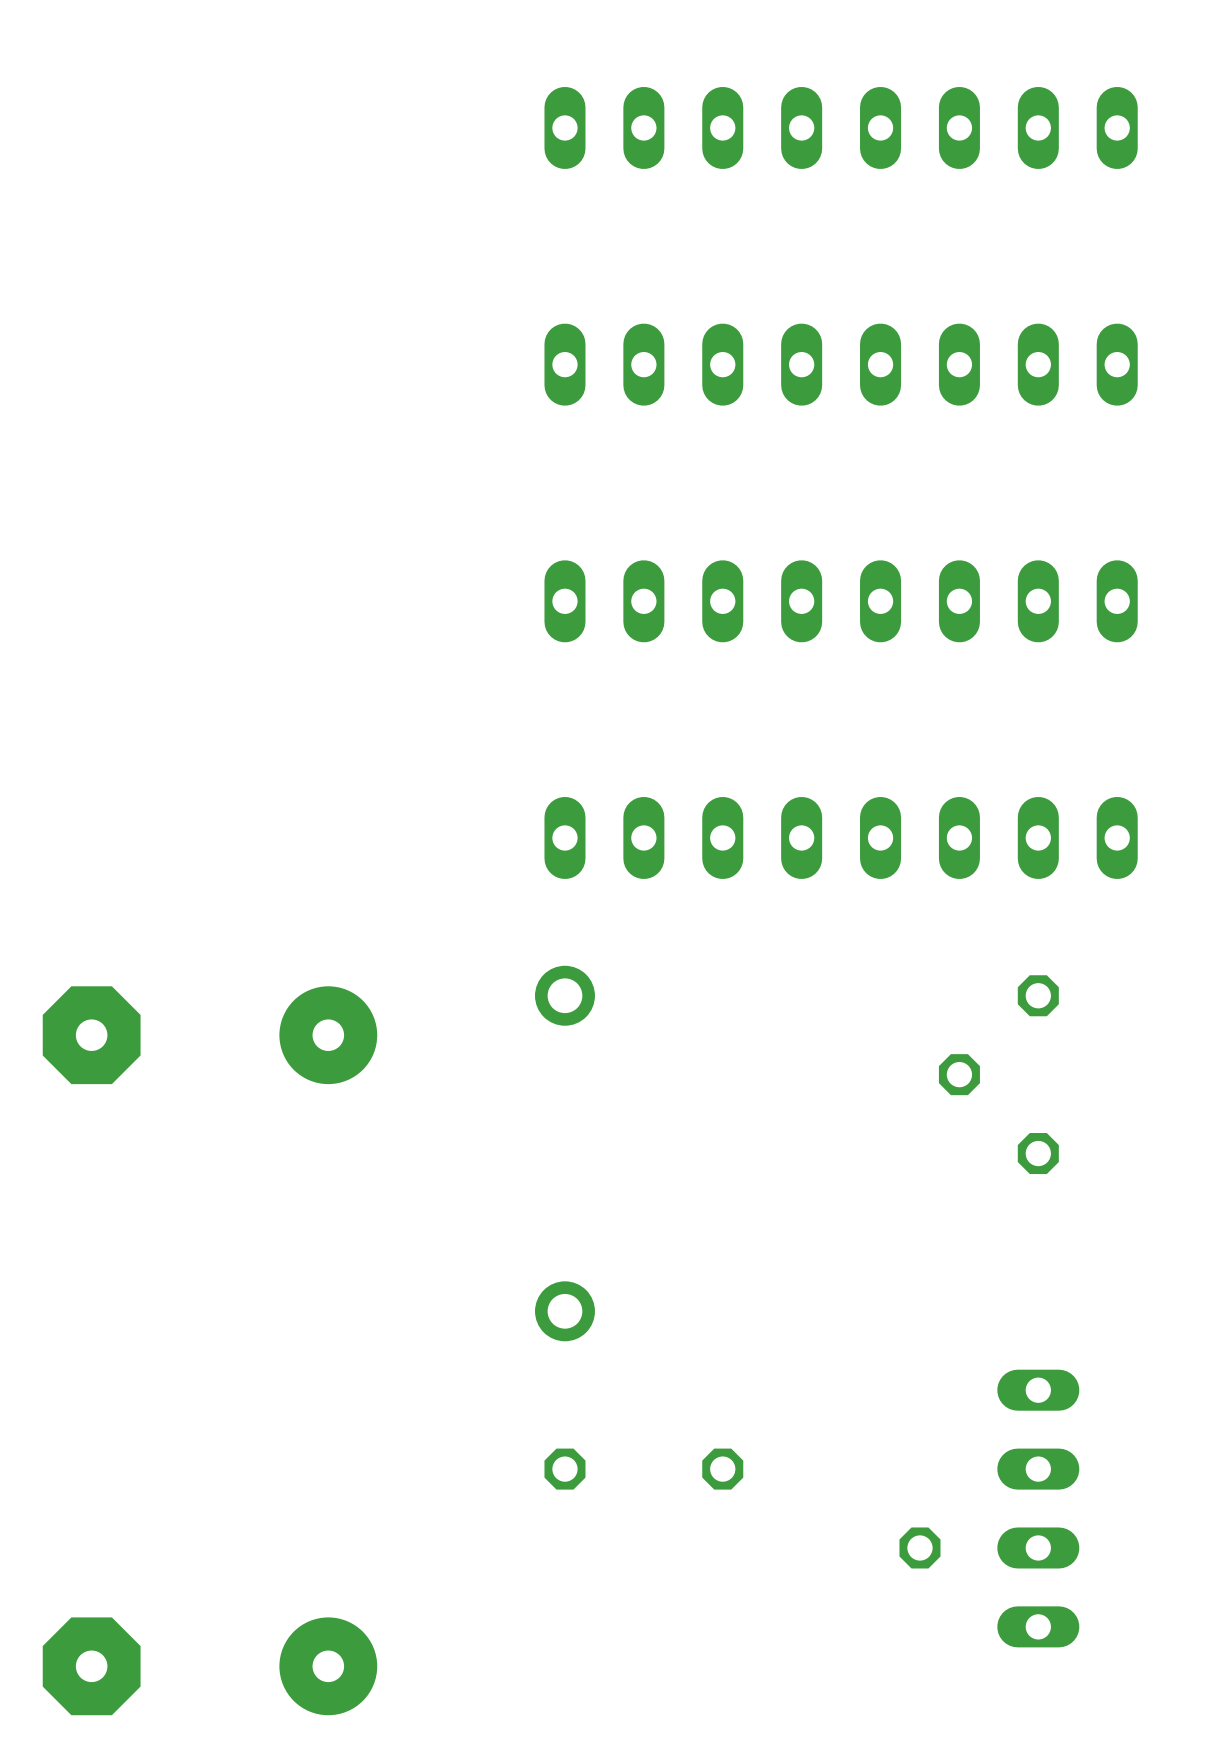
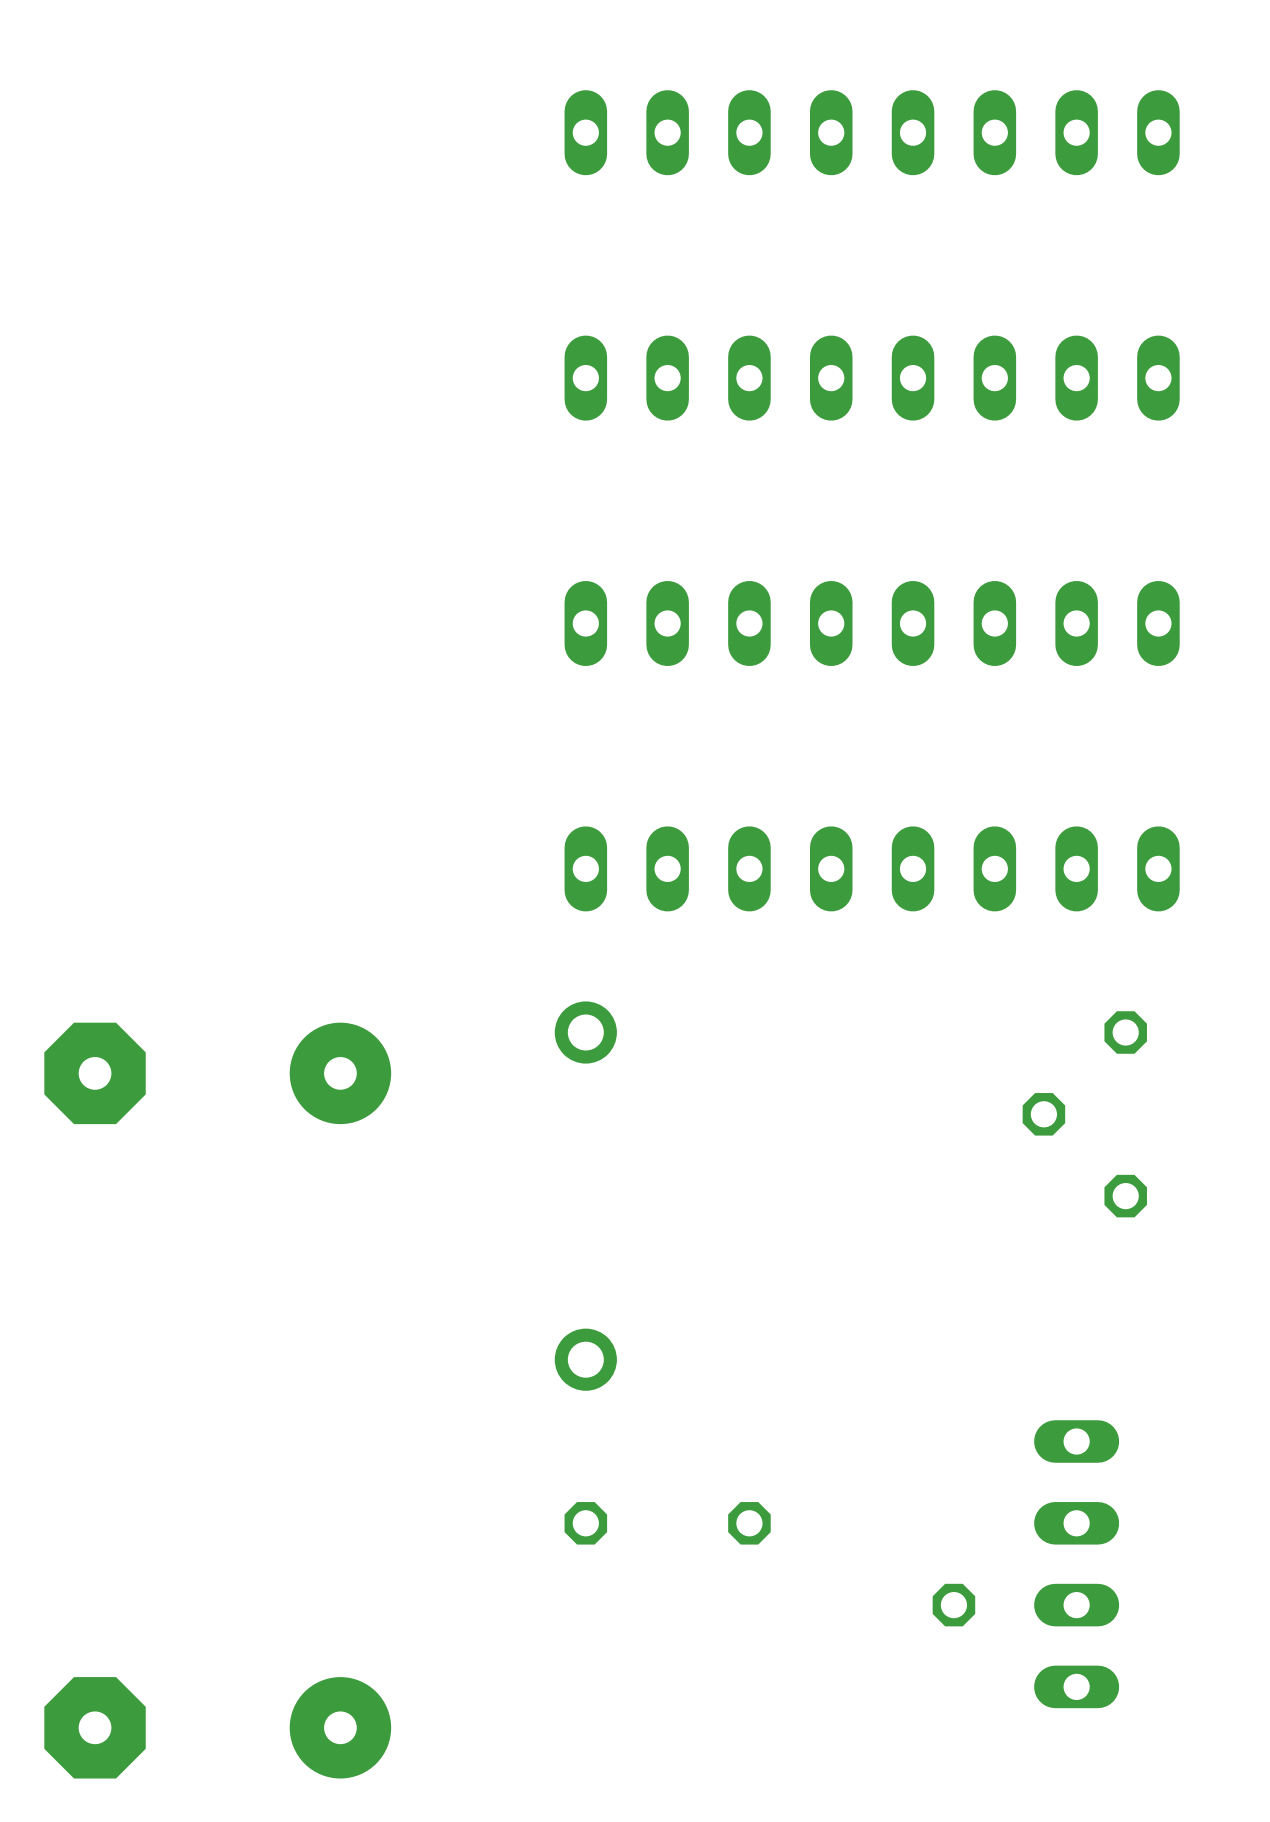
part position: (998, 1074) -> (1084, 1114)

